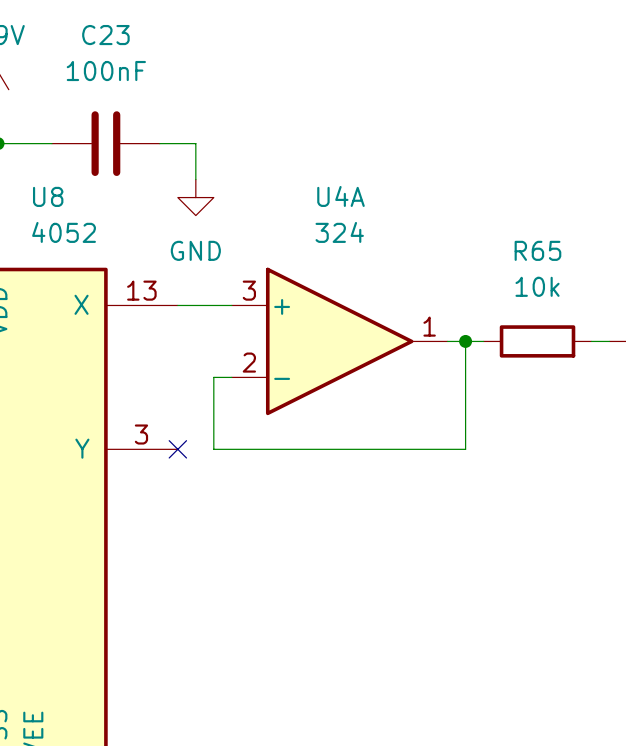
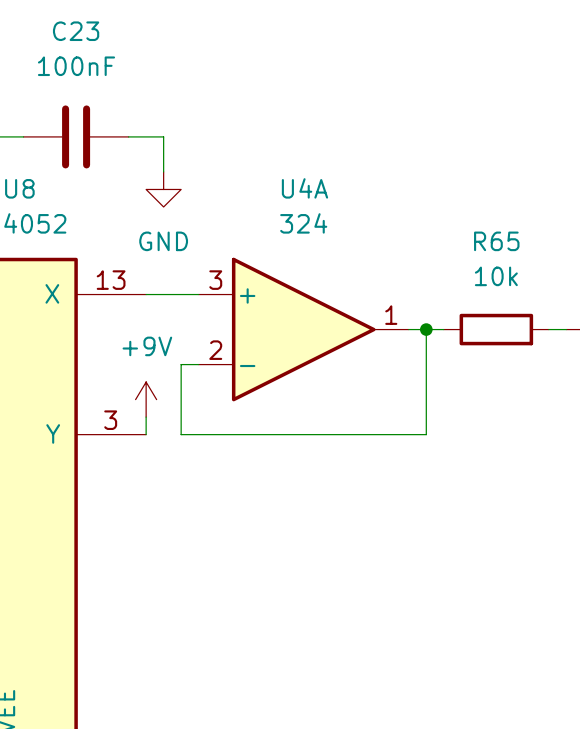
power symbol: none -> +9V (146, 399)
wire: none -> (146, 417) (146, 434)
no-connect mark: (177, 449) -> none

